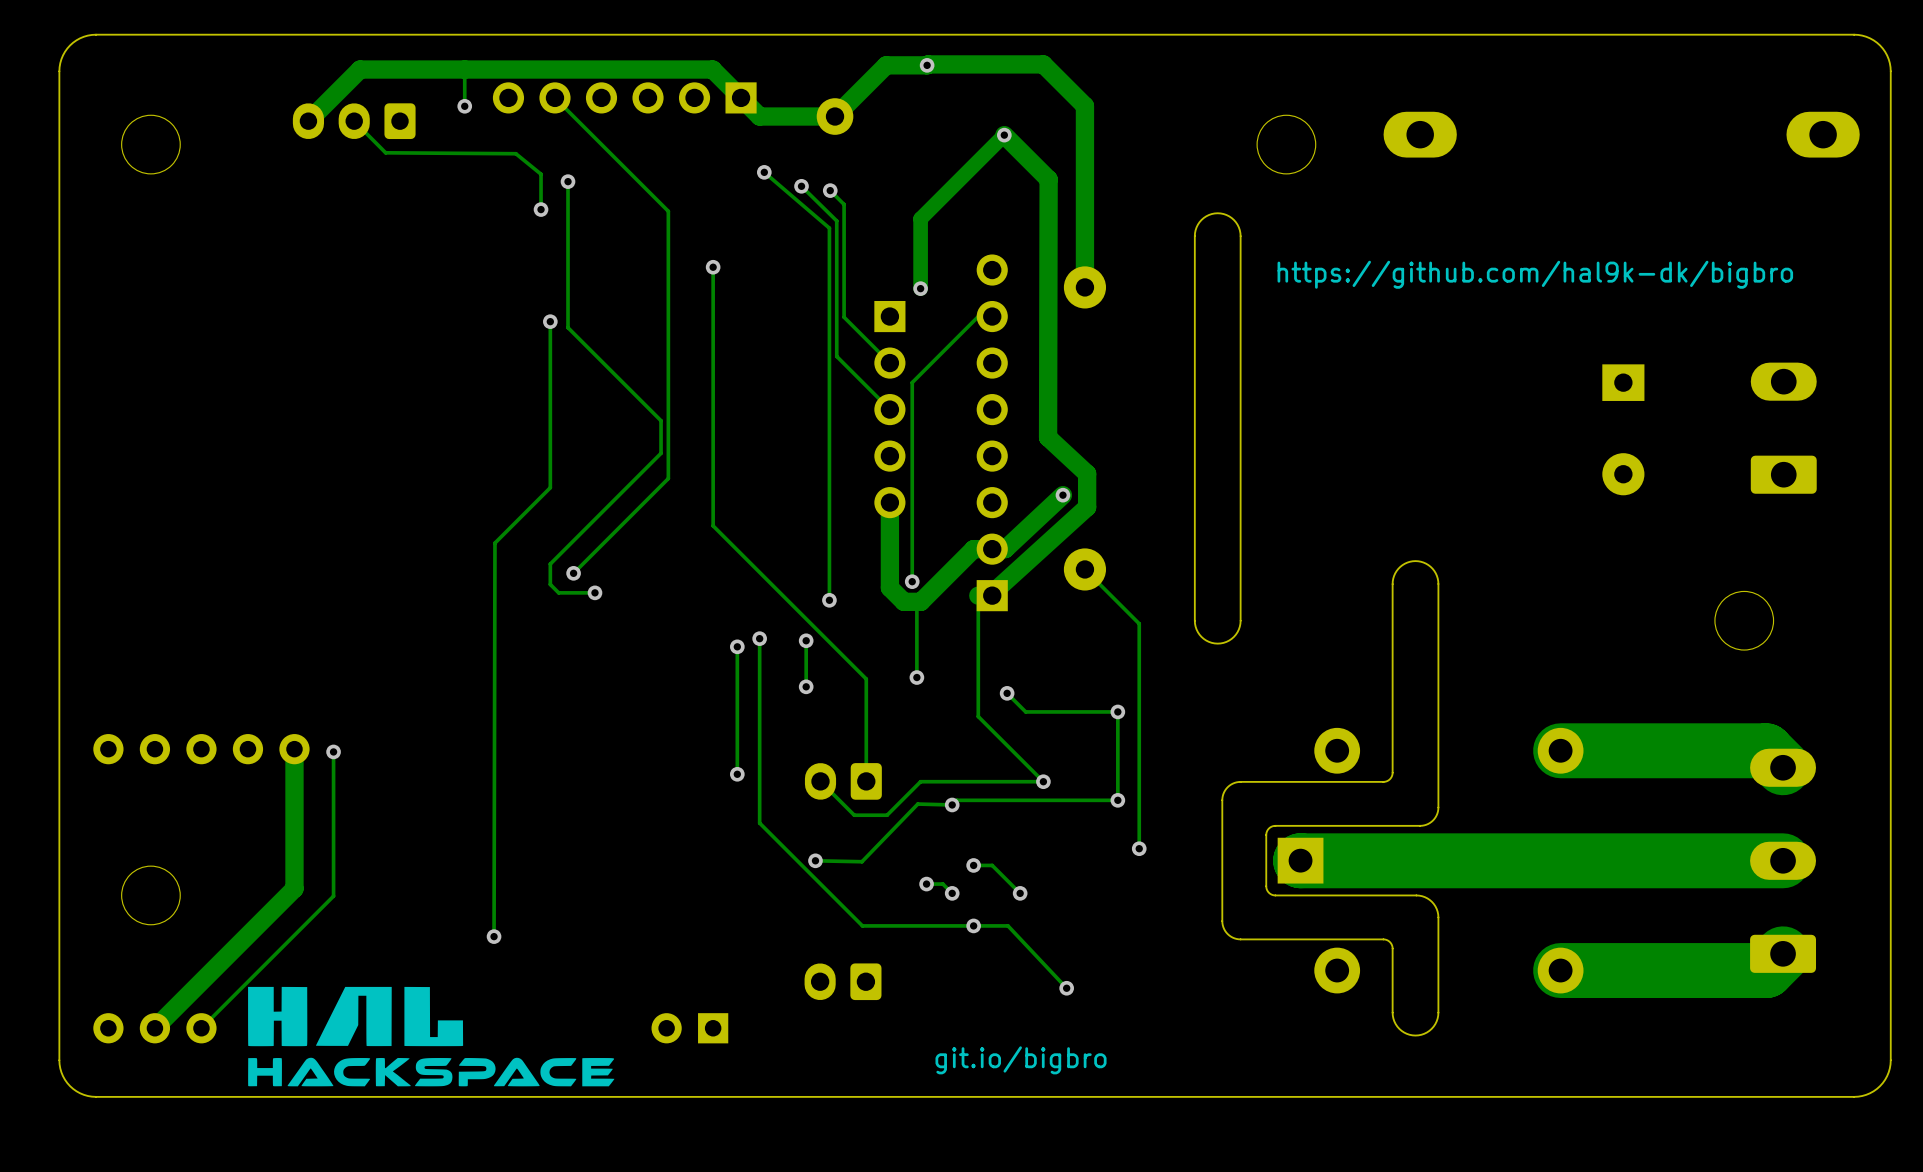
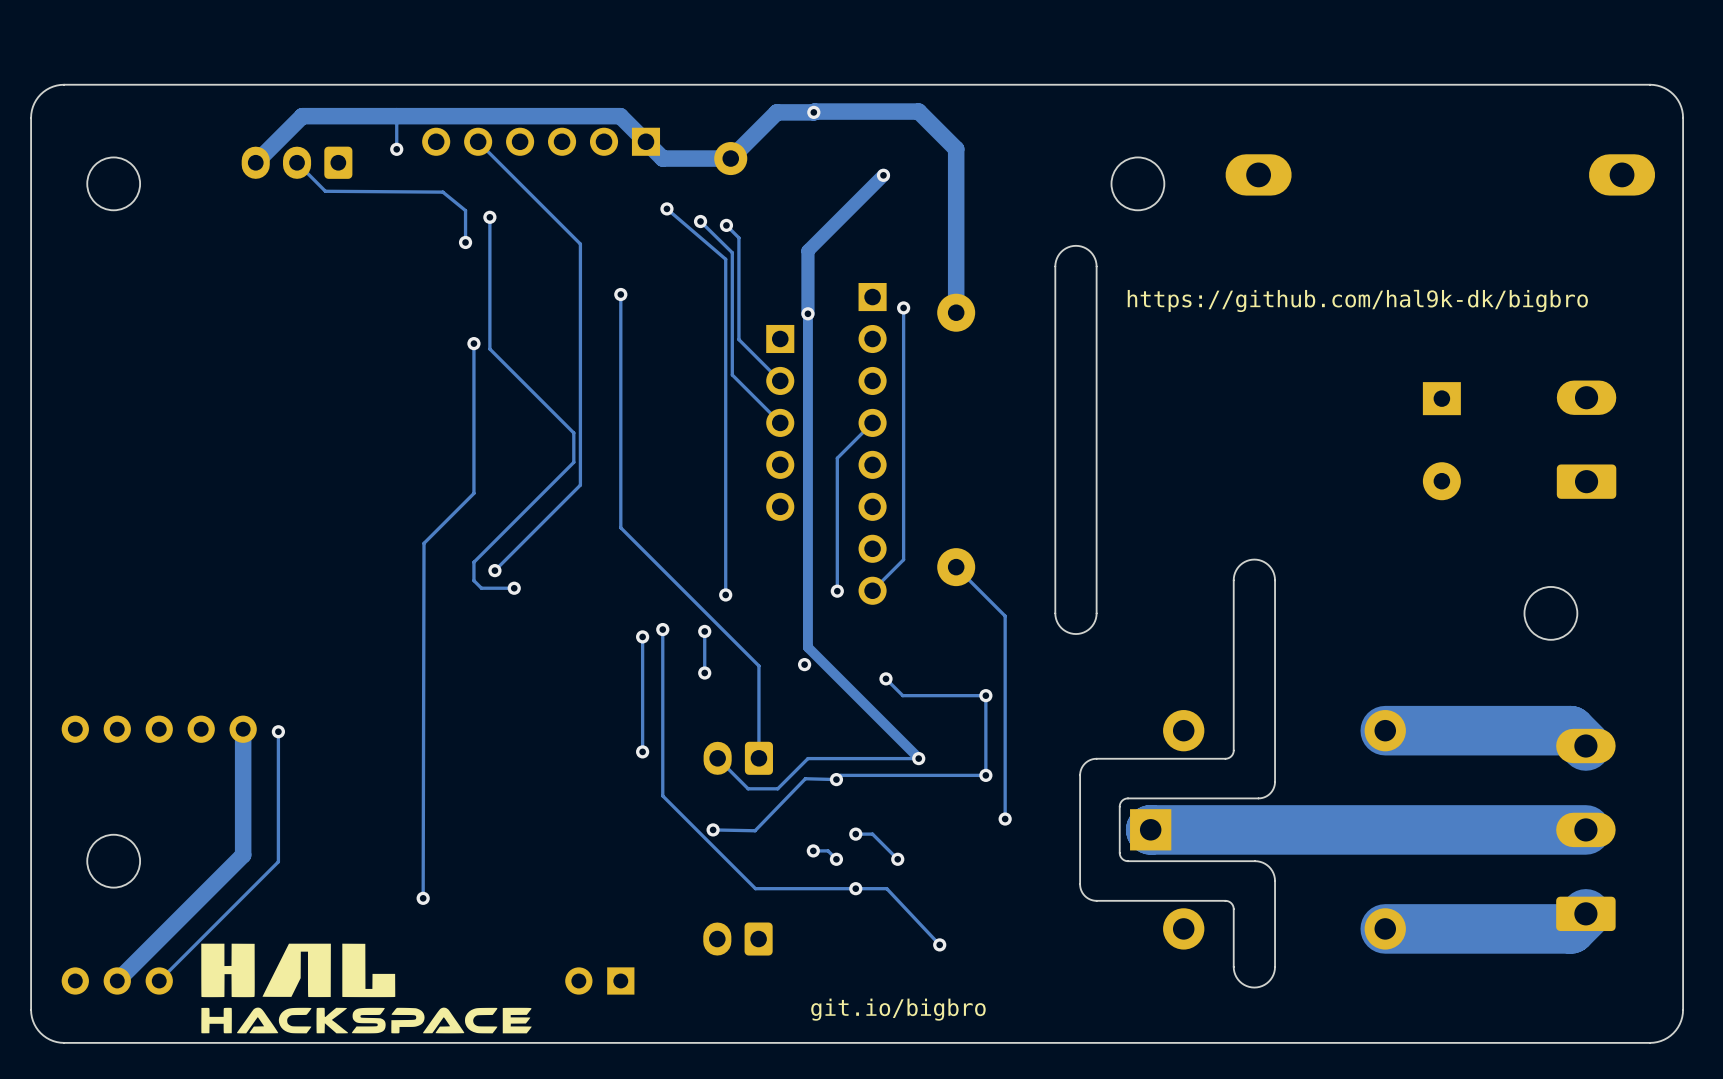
track: (1004, 135) (1048, 179) (1048, 437) (1087, 473) (1087, 507) (989, 595) (978, 595) (978, 716) (1043, 781) -> (807, 313) (807, 647) (918, 758)
track: none -> (903, 307) (903, 559) (872, 590)
via: none -> (903, 307)
track: (978, 316) (912, 382) (912, 581) -> none
track: none -> (872, 422) (837, 458) (837, 591)
part rotation: 0° (992, 432) -> 180° (872, 443)
track: (1062, 495) (1005, 549) (973, 549) (920, 601) -> none
via: (1062, 495) -> none
track: (889, 502) (889, 587) (903, 601) (920, 601) -> none
via position: (912, 581) -> (837, 591)
track: (920, 601) (916, 605) (916, 677) -> none

